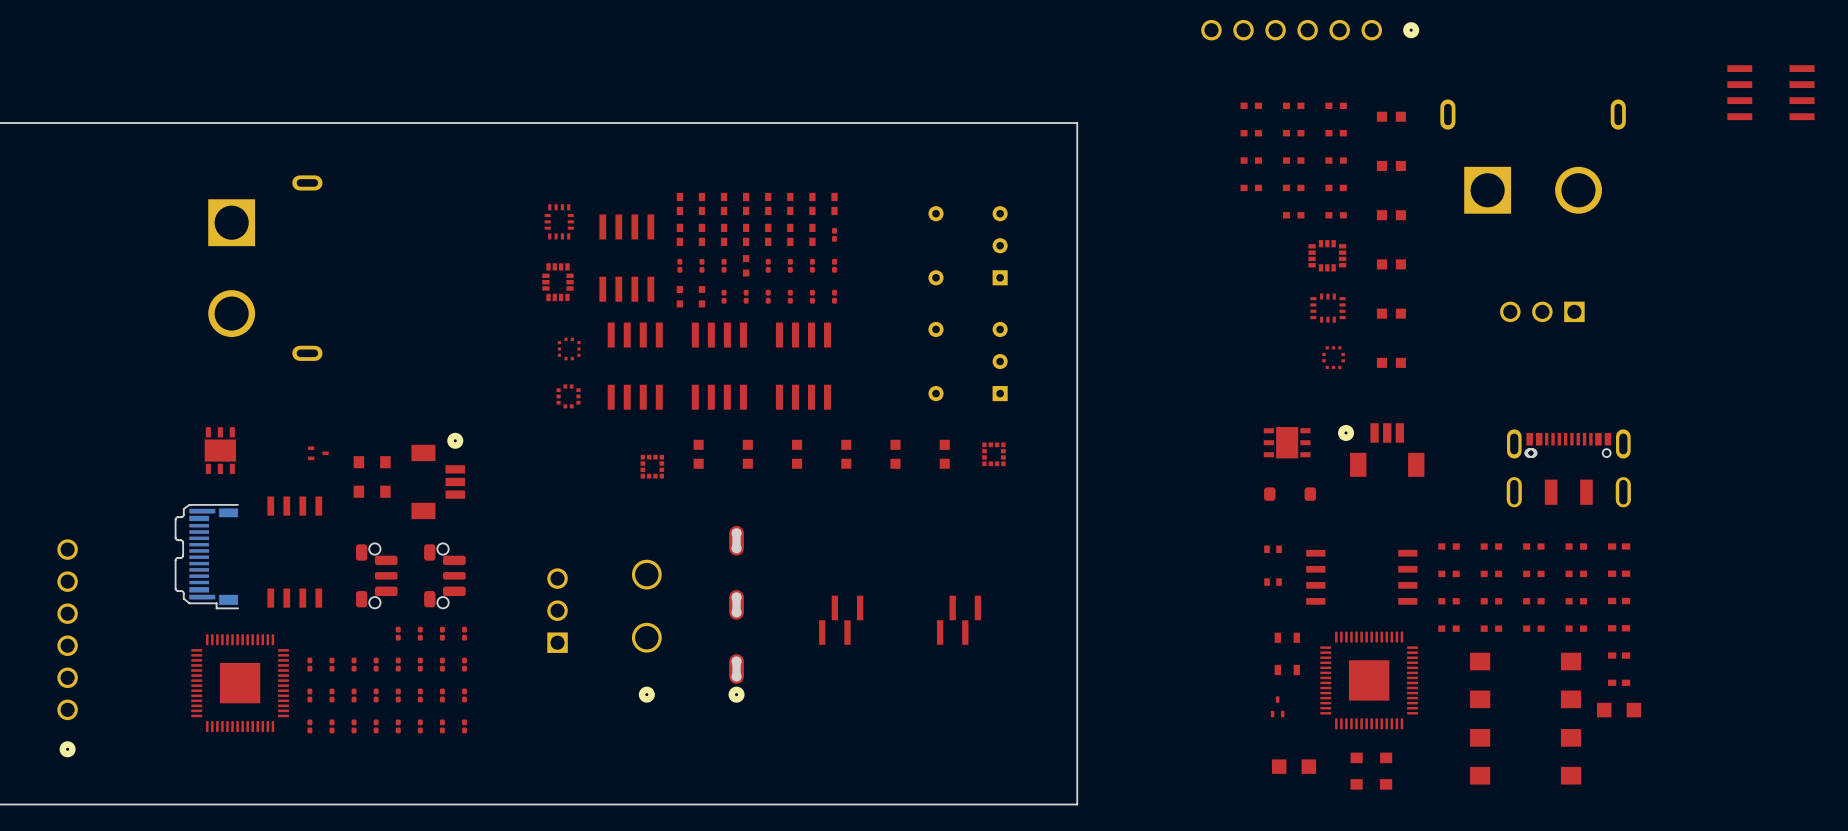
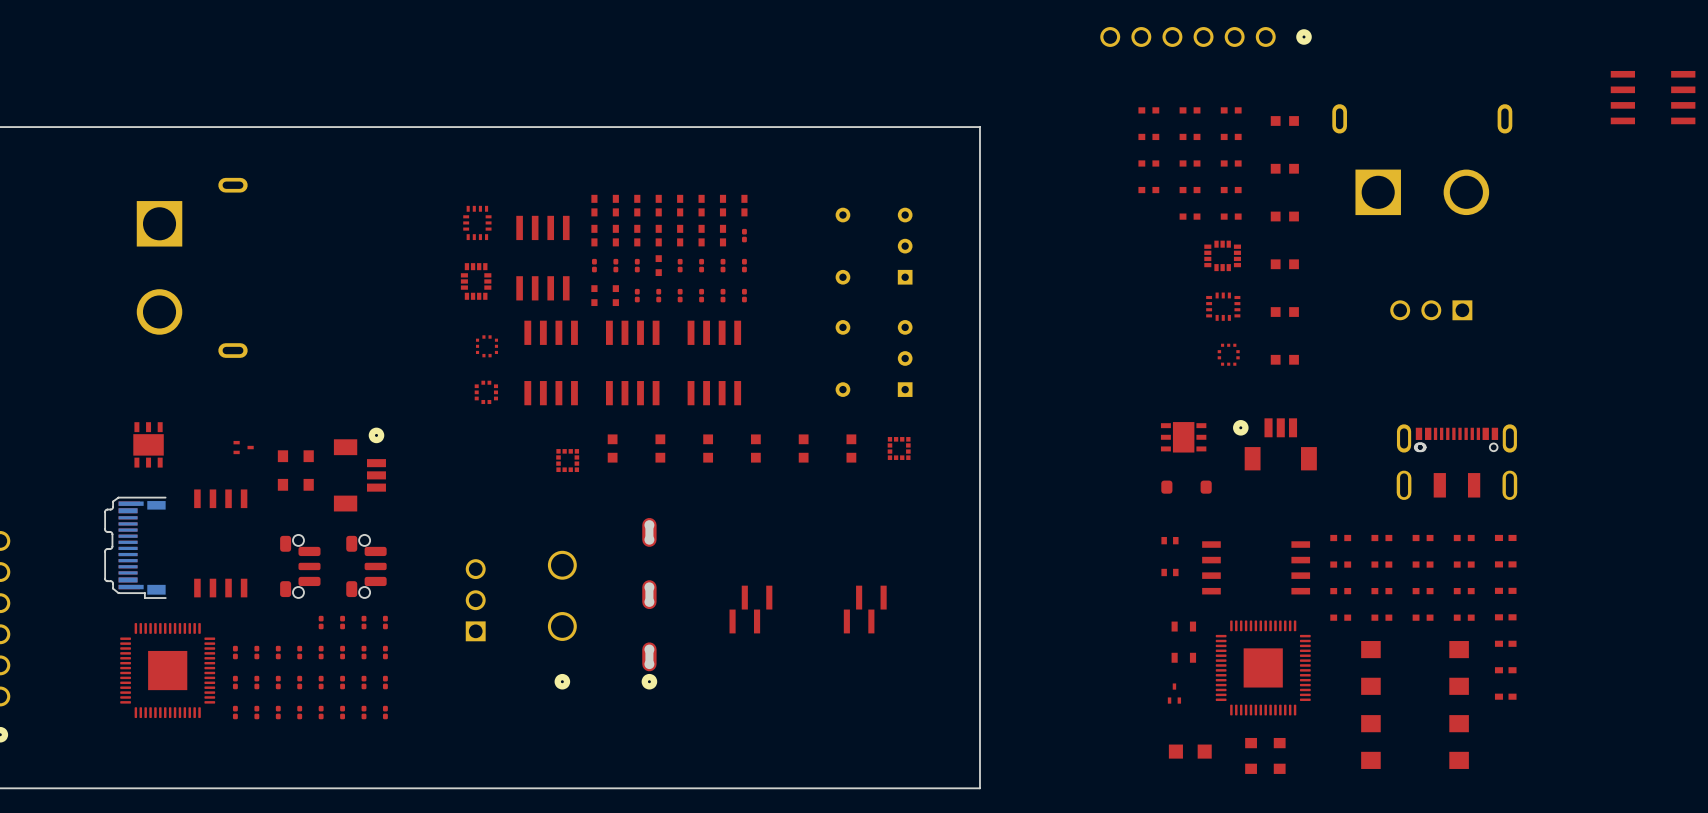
part footprint: [1597, 702, 1642, 718] -> [1494, 693, 1517, 700]

